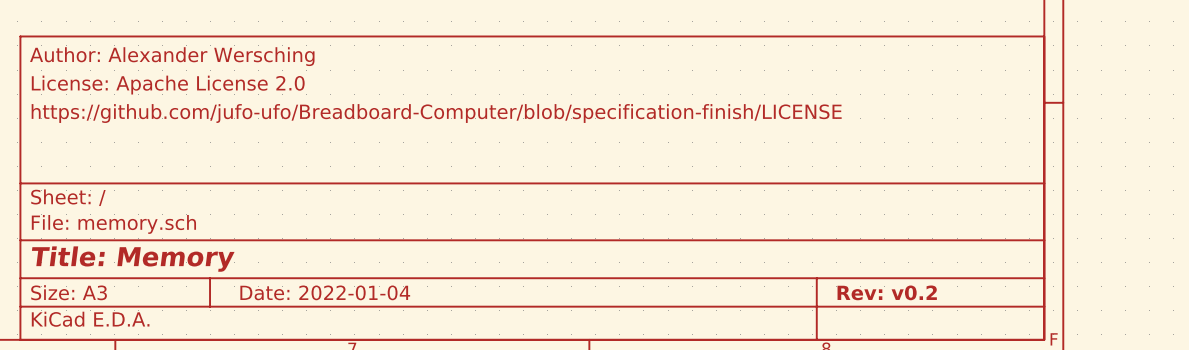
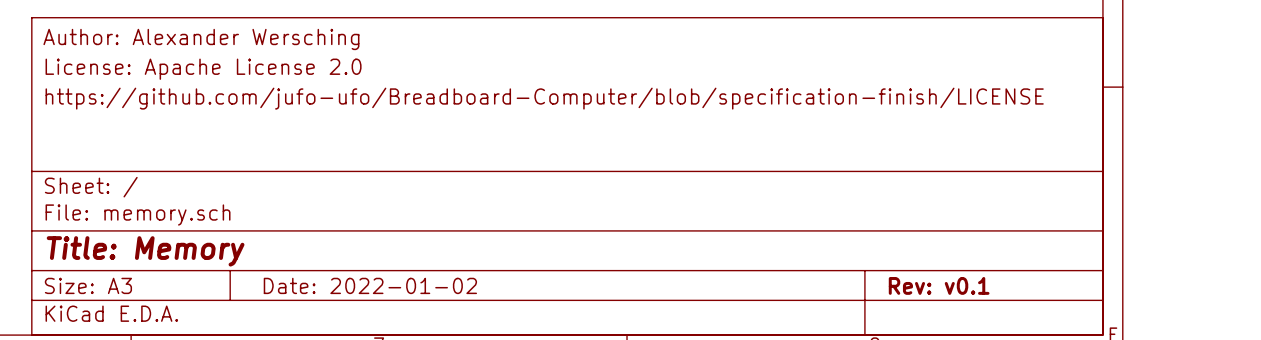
title block: Date: 2022-01-04 (325, 292) -> Date: 2022-01-02 (370, 285)
title block: Rev: v0.2 (887, 292) -> Rev: v0.1 (939, 285)

